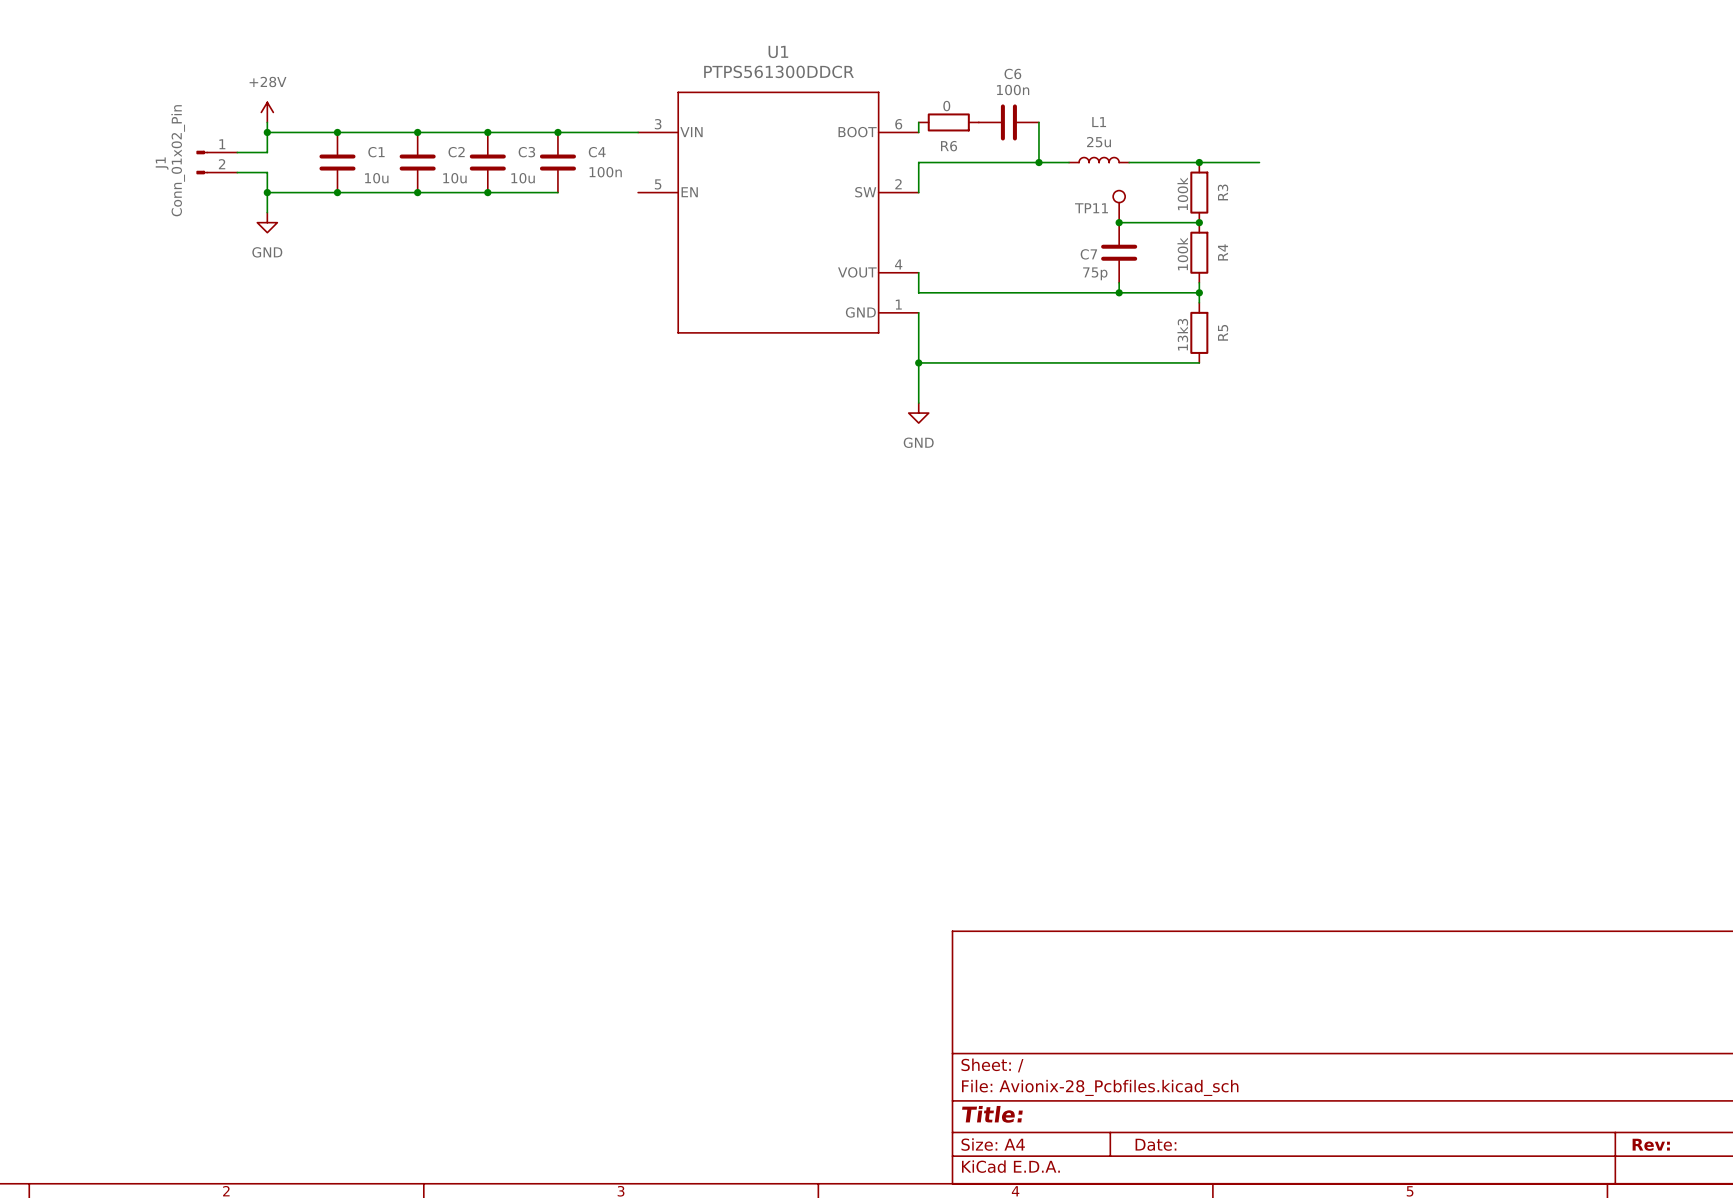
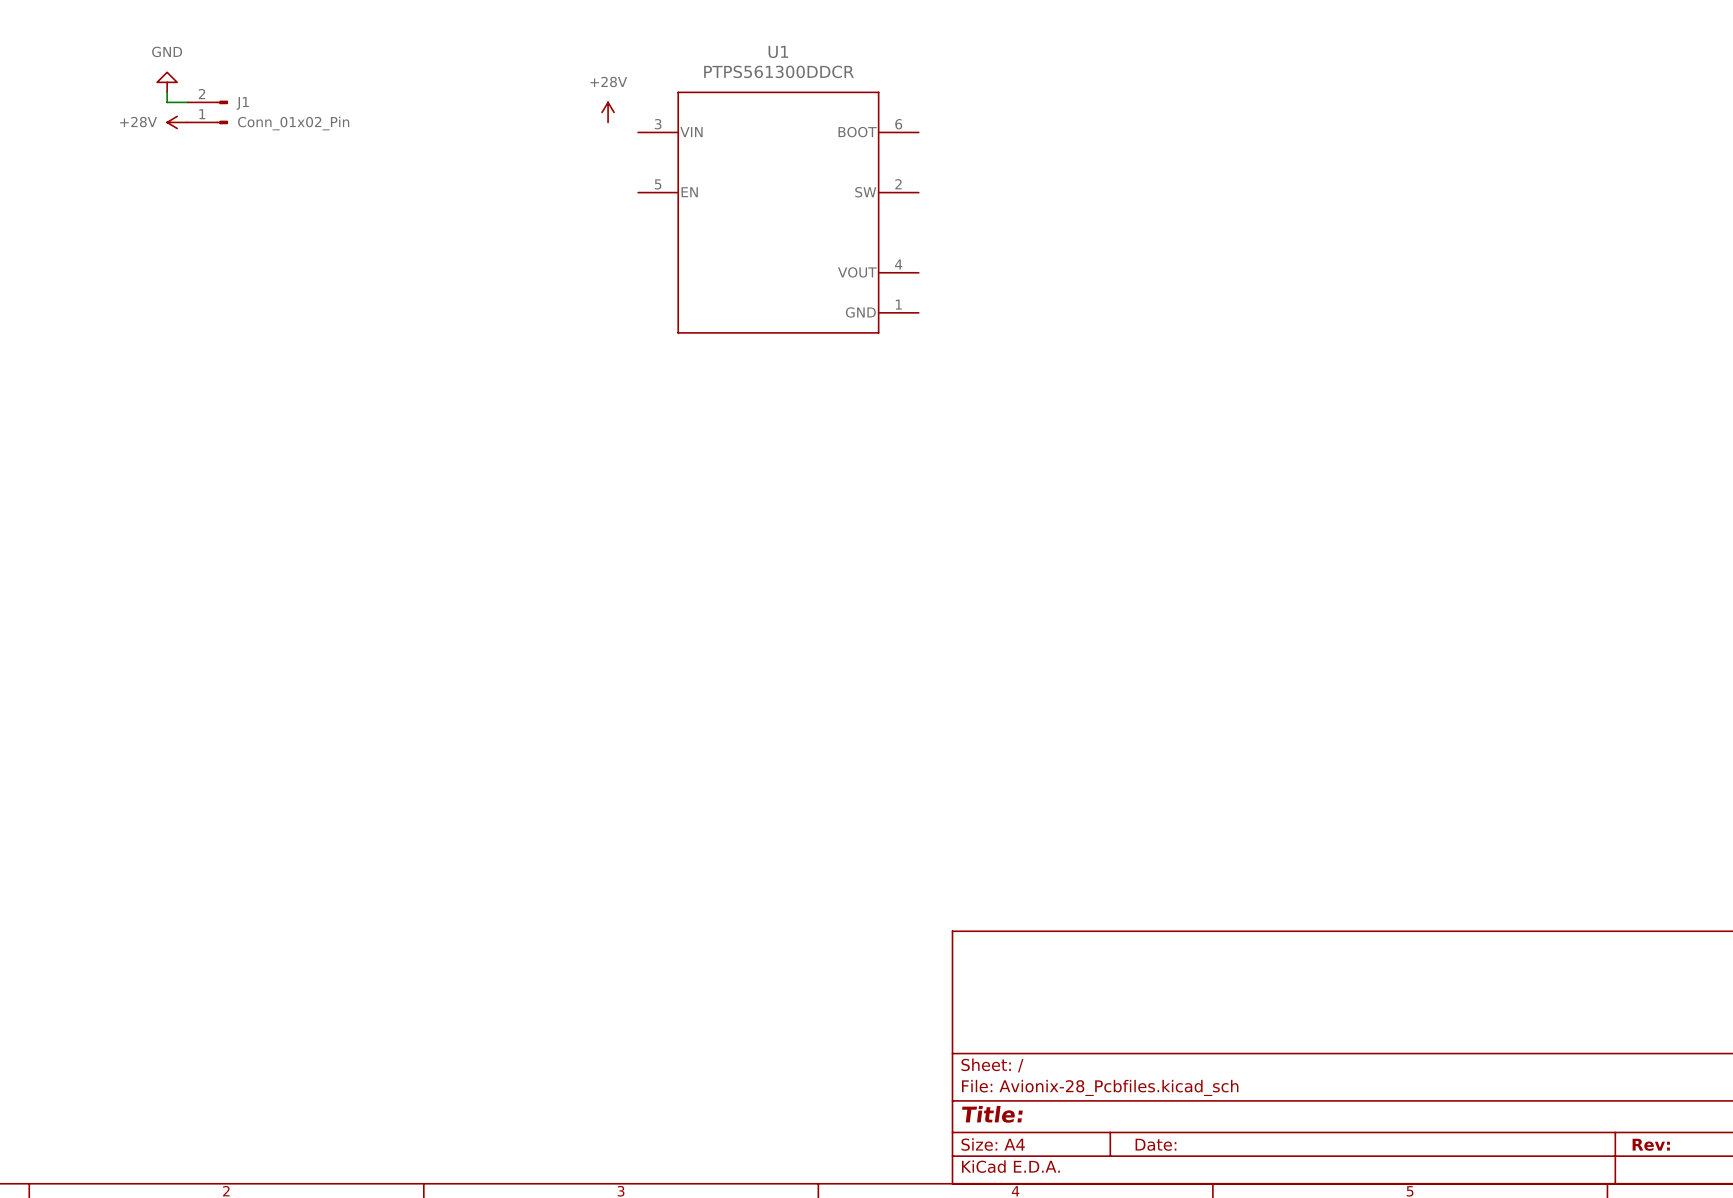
wire: none -> (167, 92) (167, 102) (187, 102)
power symbol rotation: 0° (267, 112) -> 90° counterclockwise (177, 122)
power symbol position: +28V (267, 112) -> +28V (177, 122)
power symbol: none -> +28V (608, 112)
wire: (267, 122) (267, 152) (237, 152) -> none
wire: (918, 122) (918, 132) -> none
R6: 0 (948, 122) -> none
C6: 100n (1008, 122) -> none
wire: (1038, 122) (1038, 162) -> none
wire: (267, 132) (638, 132) -> none
junction: (267, 132) -> none
junction: (337, 132) -> none
junction: (417, 132) -> none
junction: (487, 132) -> none
junction: (557, 132) -> none
J1 value position: Conn_01x02_Pin (178, 160) -> Conn_01x02_Pin (293, 123)
L1: 25u (1099, 160) -> none
J1 rotation: 0° (202, 162) -> 180° (222, 112)
J1 position: (216, 162) -> (207, 112)
C1: 10u (337, 162) -> none
C2: 10u (417, 162) -> none
C3: 10u (487, 162) -> none
C4: 100n (557, 162) -> none
junction: (1038, 162) -> none
wire: (1069, 162) (918, 162) (918, 192) -> none
wire: (1129, 162) (1259, 162) -> none
junction: (1199, 162) -> none
J1 name position: J1 (162, 163) -> J1 (242, 103)
wire: (237, 172) (267, 172) (267, 212) -> none
wire: (267, 192) (557, 192) -> none
junction: (267, 192) -> none
junction: (337, 192) -> none
junction: (417, 192) -> none
junction: (487, 192) -> none
R3: 100k (1199, 192) -> none
TP11: (1119, 206) -> none
power symbol rotation: 0° (267, 222) -> 180° (167, 82)
power symbol position: GND (267, 222) -> GND (167, 82)
wire: (1119, 222) (1199, 222) -> none
junction: (1119, 222) -> none
junction: (1199, 222) -> none
C7: 75p (1119, 252) -> none
R4: 100k (1199, 252) -> none
wire: (918, 272) (918, 292) (1199, 292) -> none
wire: (1119, 282) (1119, 292) -> none
wire: (1199, 282) (1199, 302) -> none
junction: (1119, 292) -> none
junction: (1199, 292) -> none
wire: (918, 312) (918, 403) -> none
R5: 13k3 (1199, 332) -> none
wire: (918, 362) (1199, 362) -> none
junction: (918, 362) -> none
power symbol: GND (918, 413) -> none

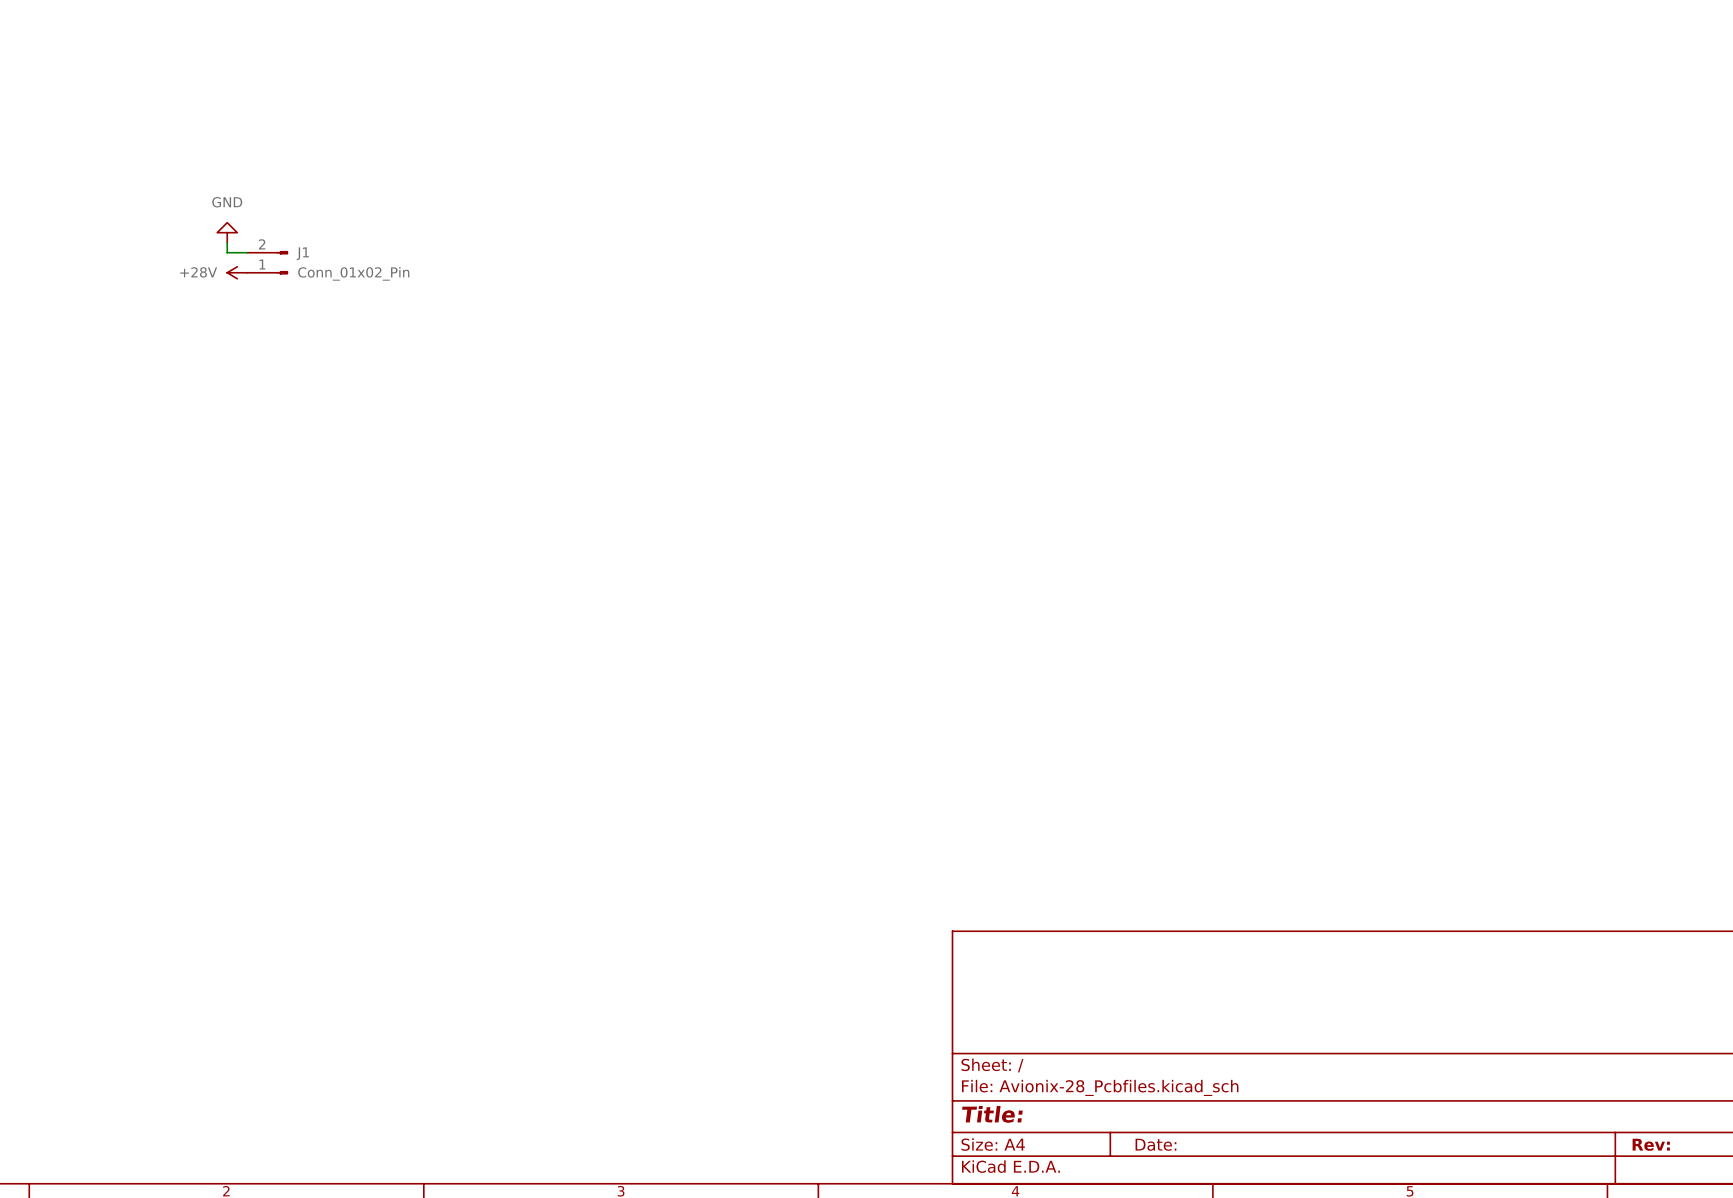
power symbol position: GND (167, 82) -> GND (227, 232)
wire: (167, 92) (167, 102) (187, 102) -> (227, 242) (227, 252) (247, 252)
J1 position: (207, 112) -> (267, 262)
power symbol: +28V (608, 112) -> none
power symbol position: +28V (177, 122) -> +28V (237, 272)
U1: PTPS561300DDCR (778, 212) -> none

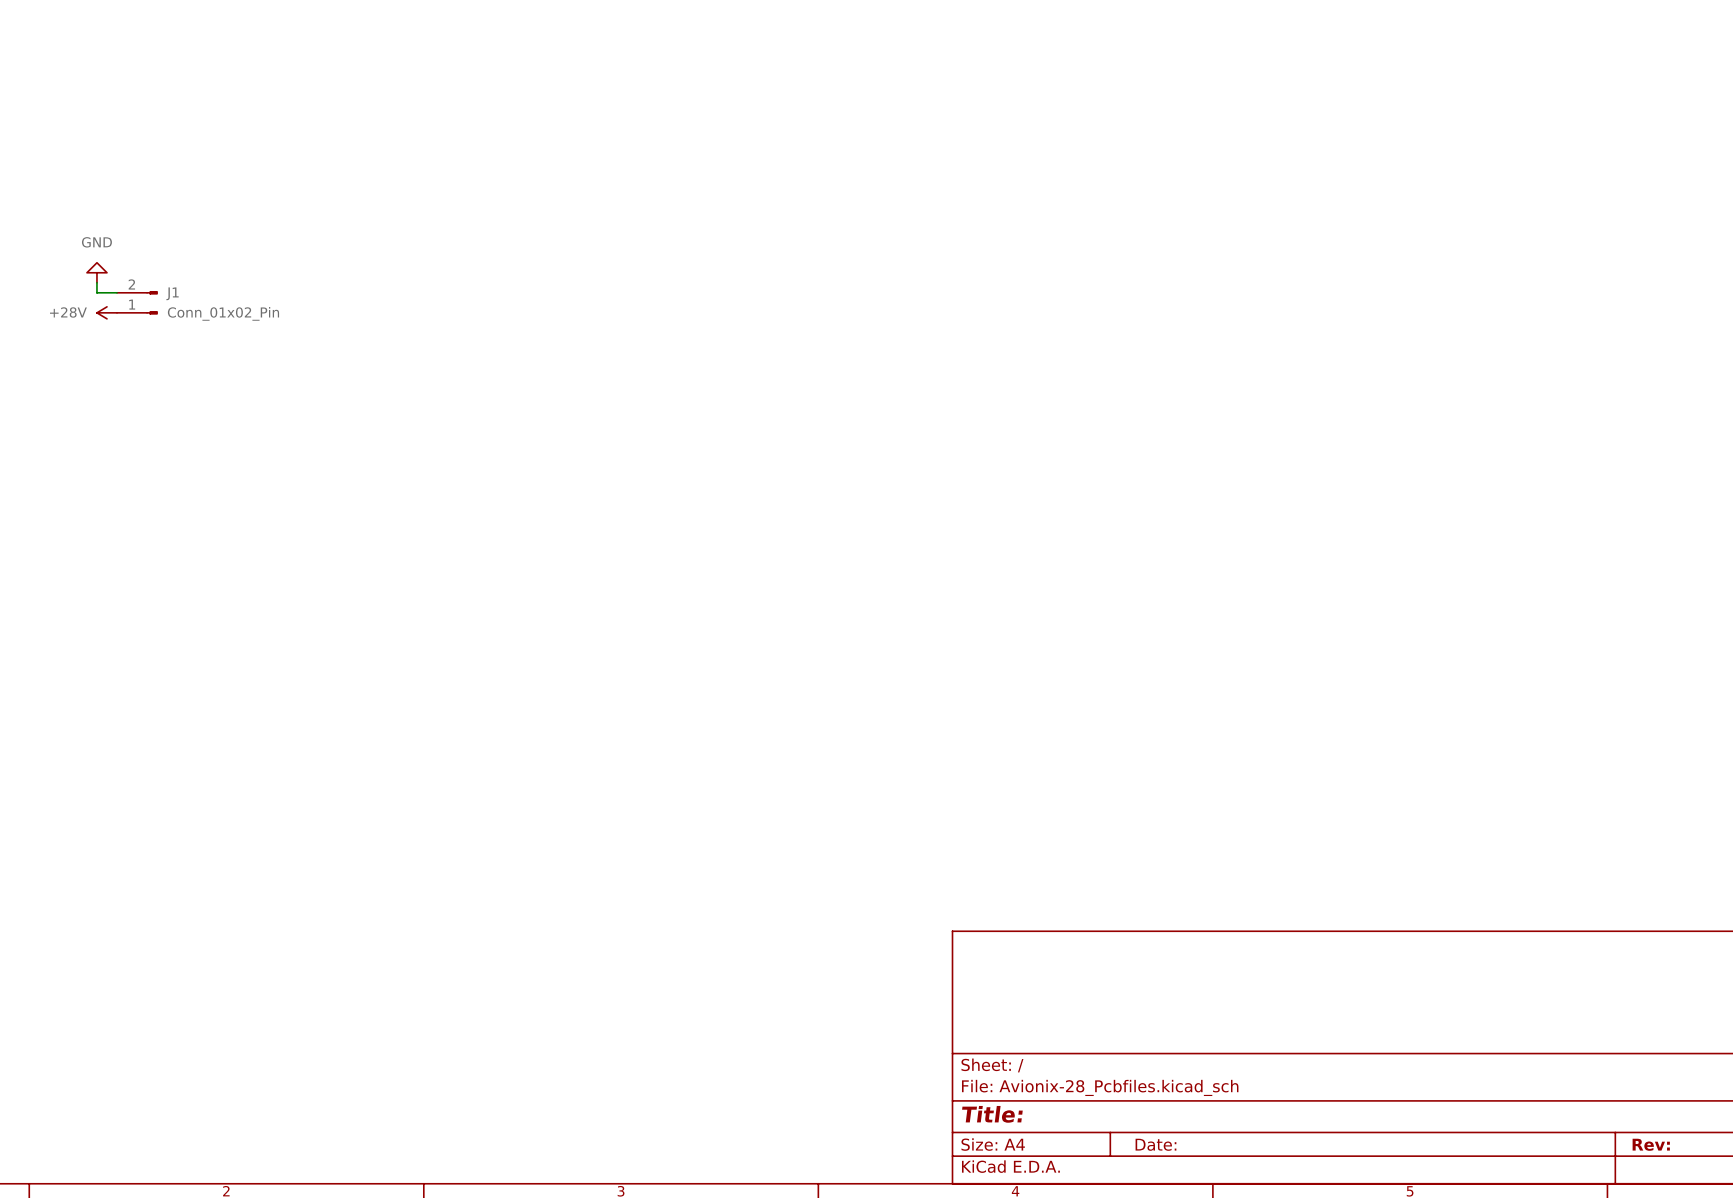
power symbol position: GND (227, 232) -> GND (96, 272)
wire: (227, 242) (227, 252) (247, 252) -> (96, 282) (96, 292) (117, 292)
J1 position: (267, 262) -> (137, 302)
power symbol position: +28V (237, 272) -> +28V (106, 312)

